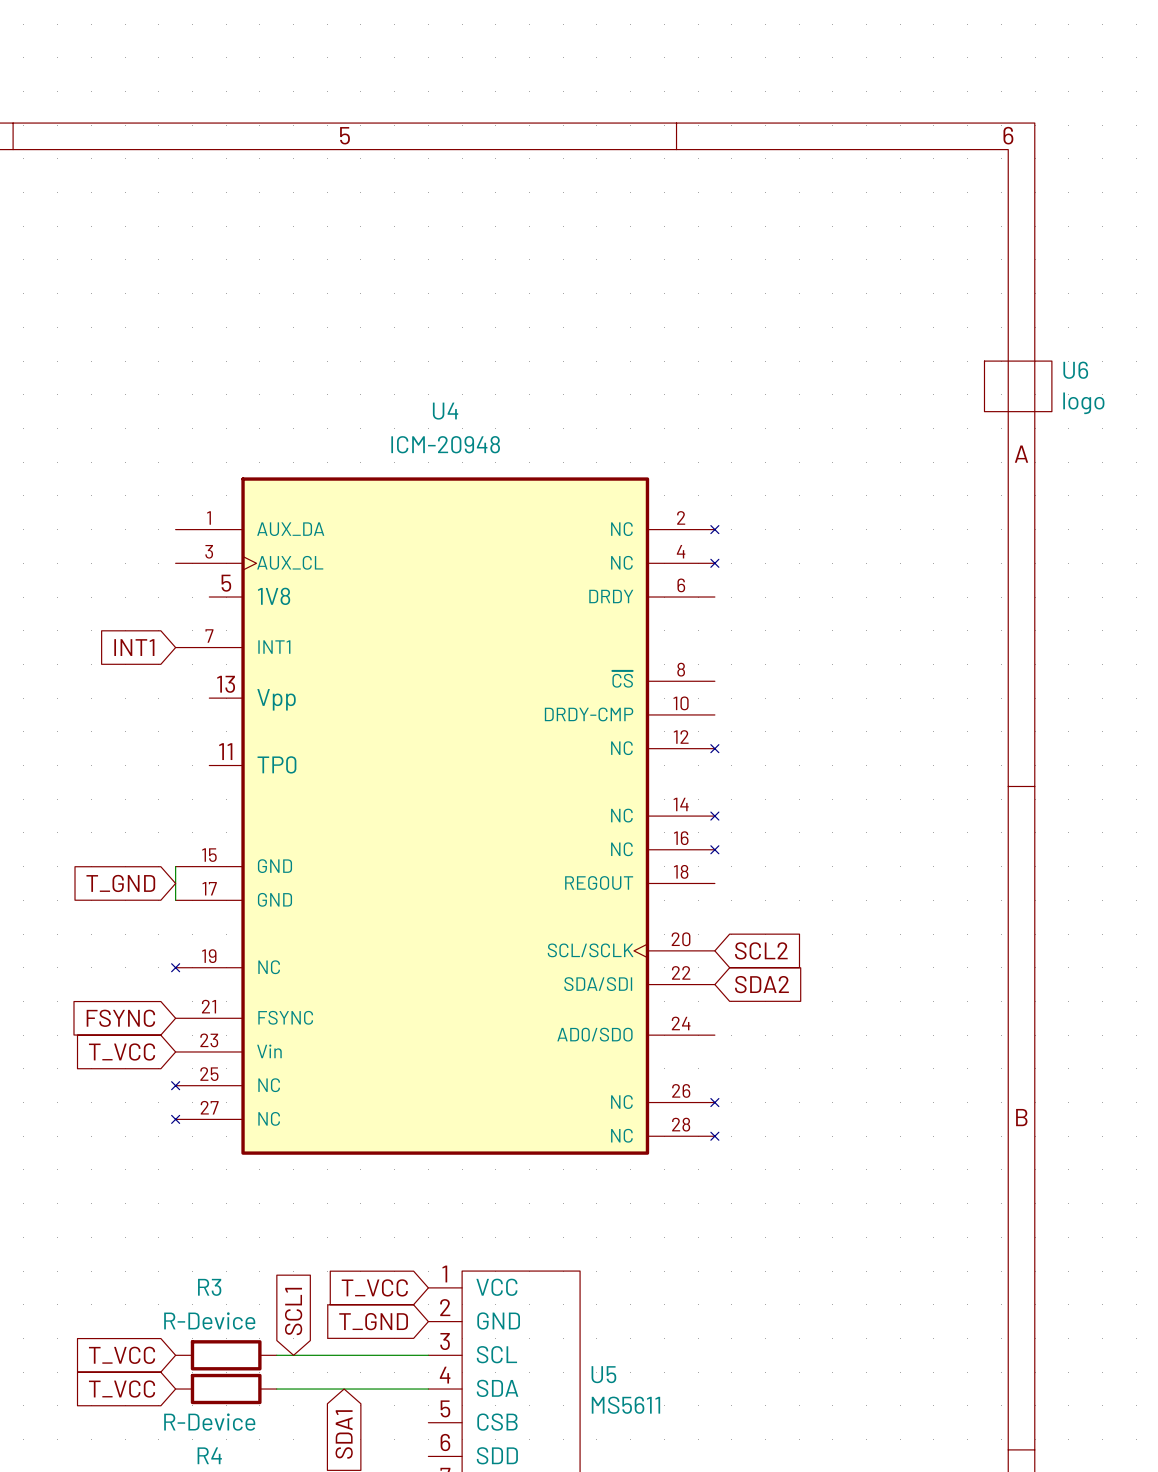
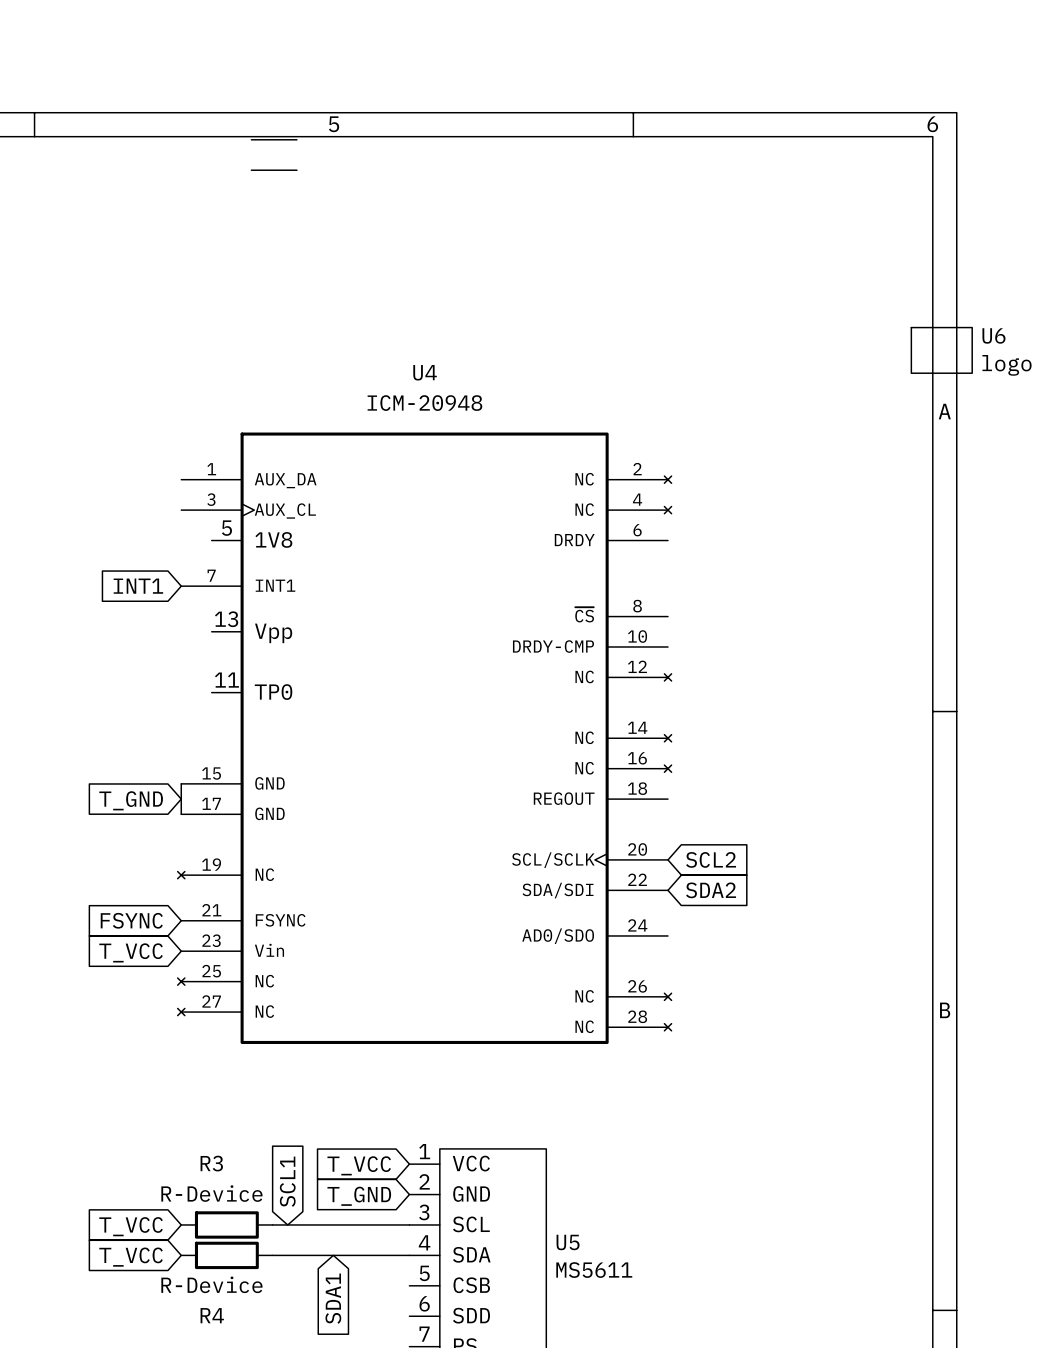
wire: none -> (251, 139) (296, 139)
wire: none -> (251, 170) (296, 170)

